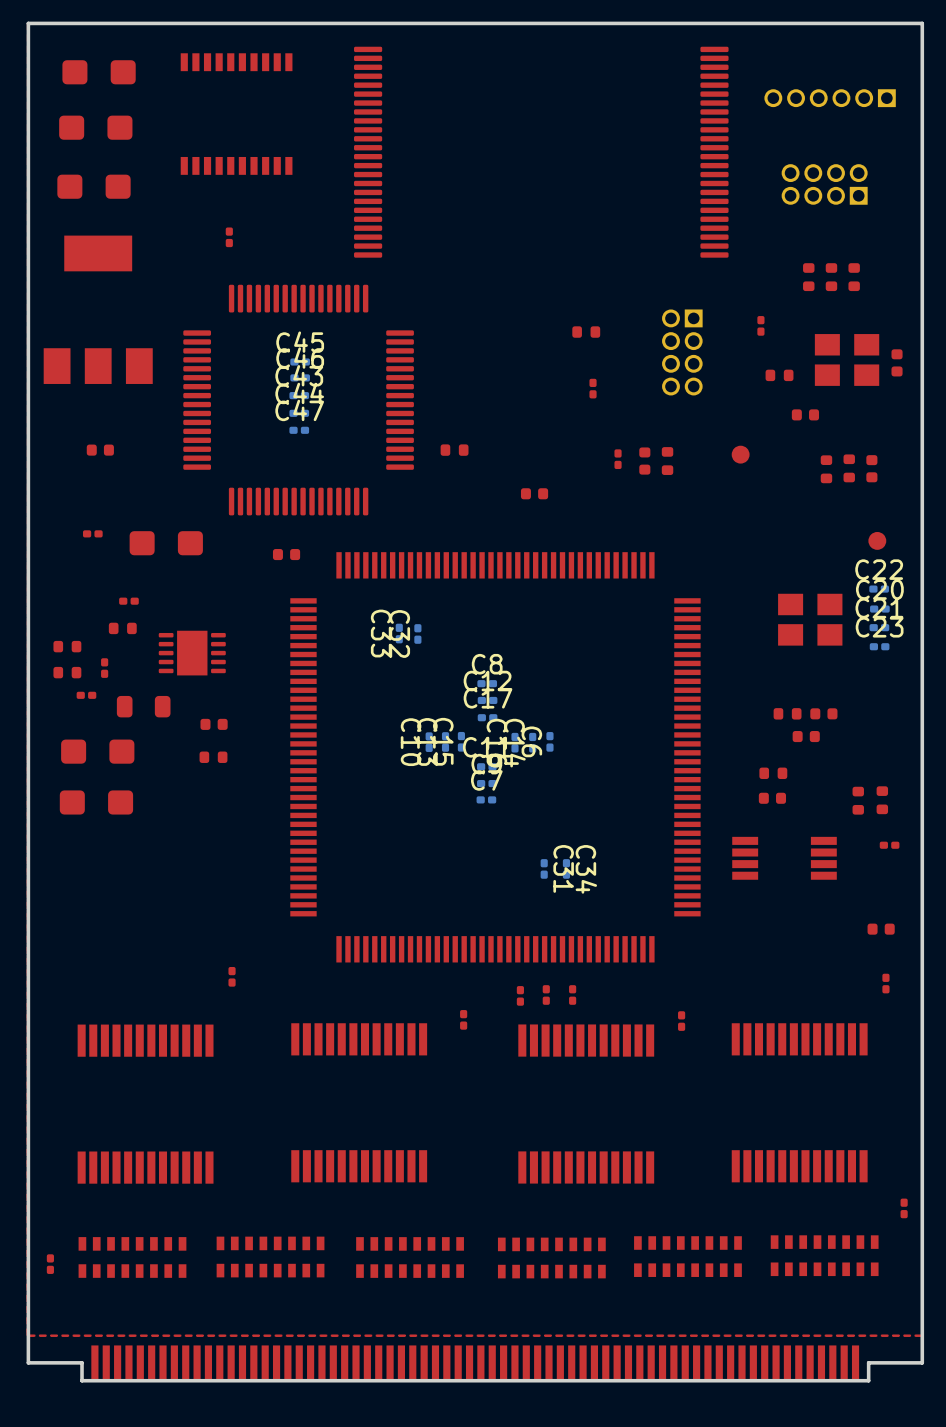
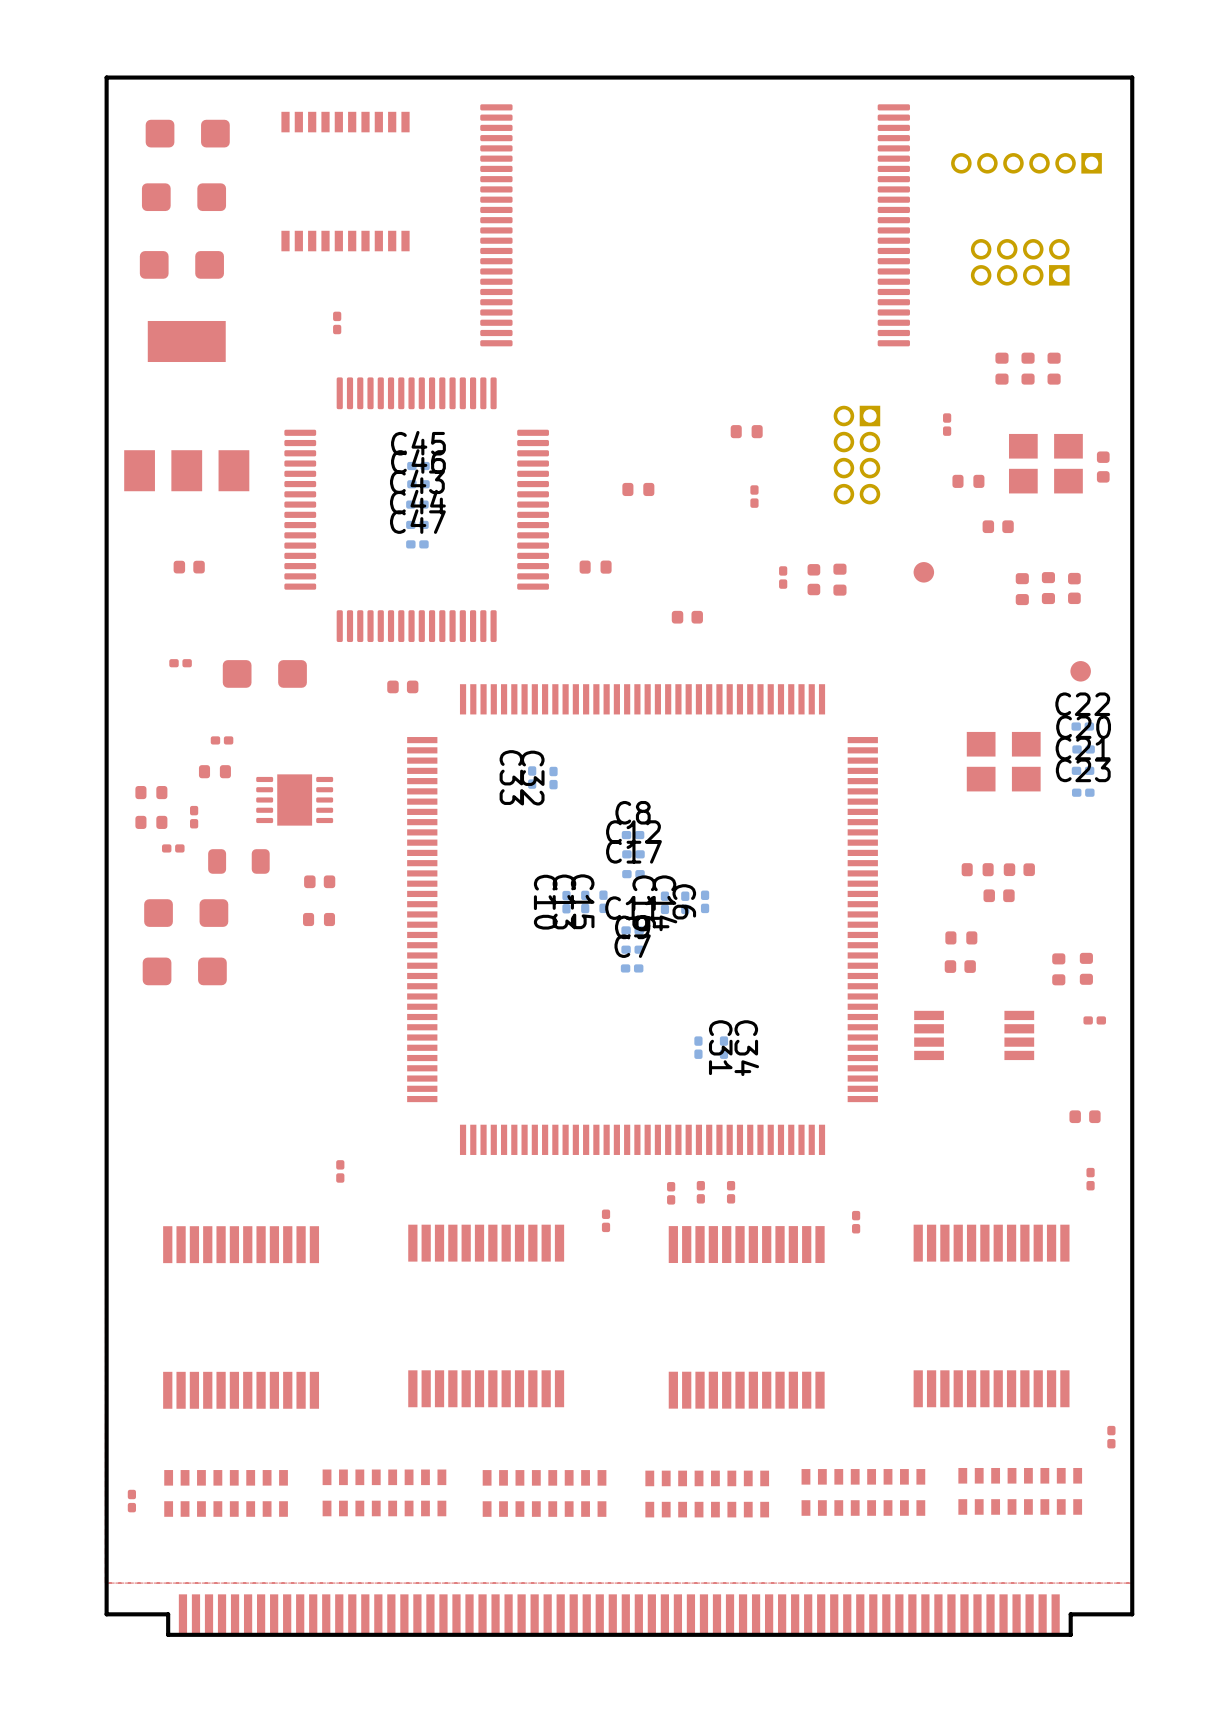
part: none -> (638, 489)

